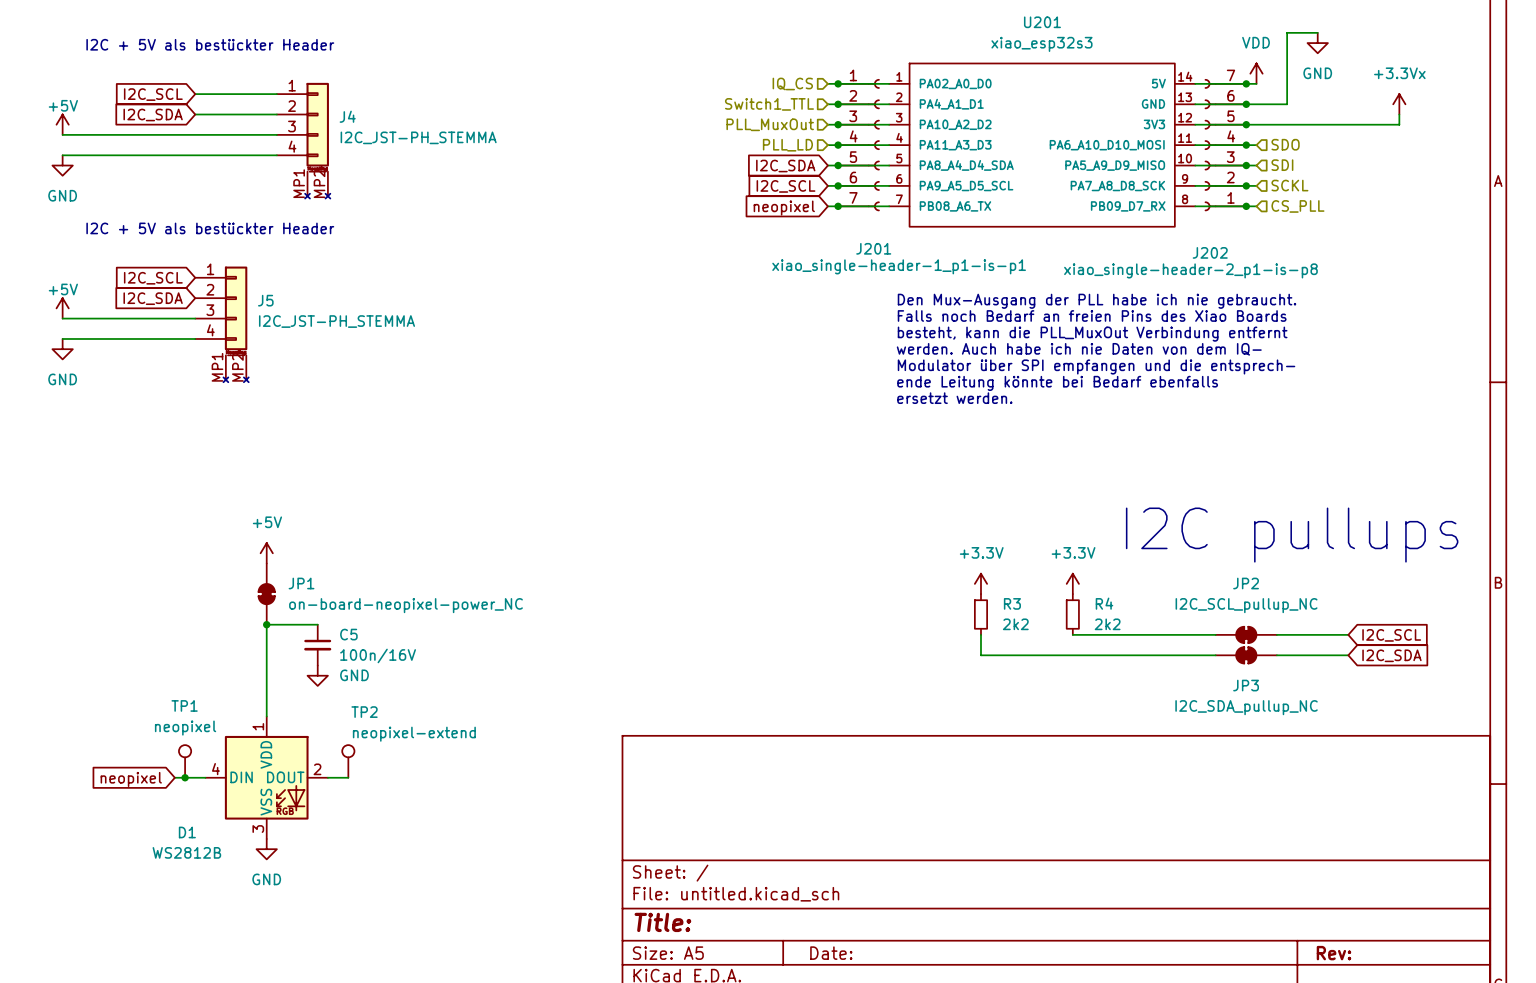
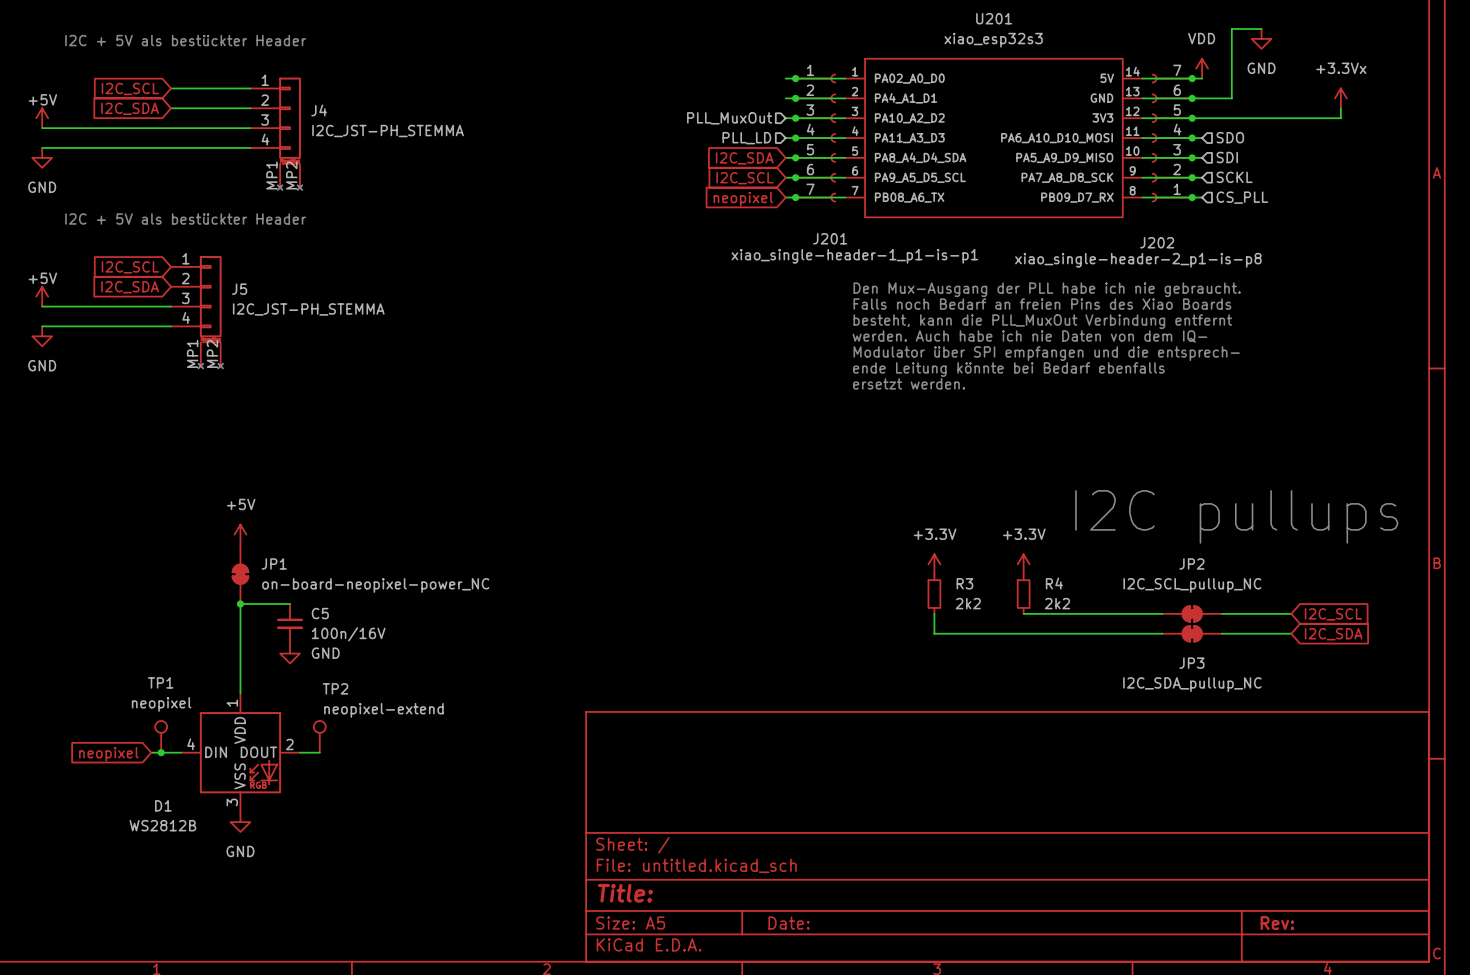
hierarchical label: IQ_CS (792, 83) -> none
hierarchical label: Switch1_TTL (769, 104) -> none

